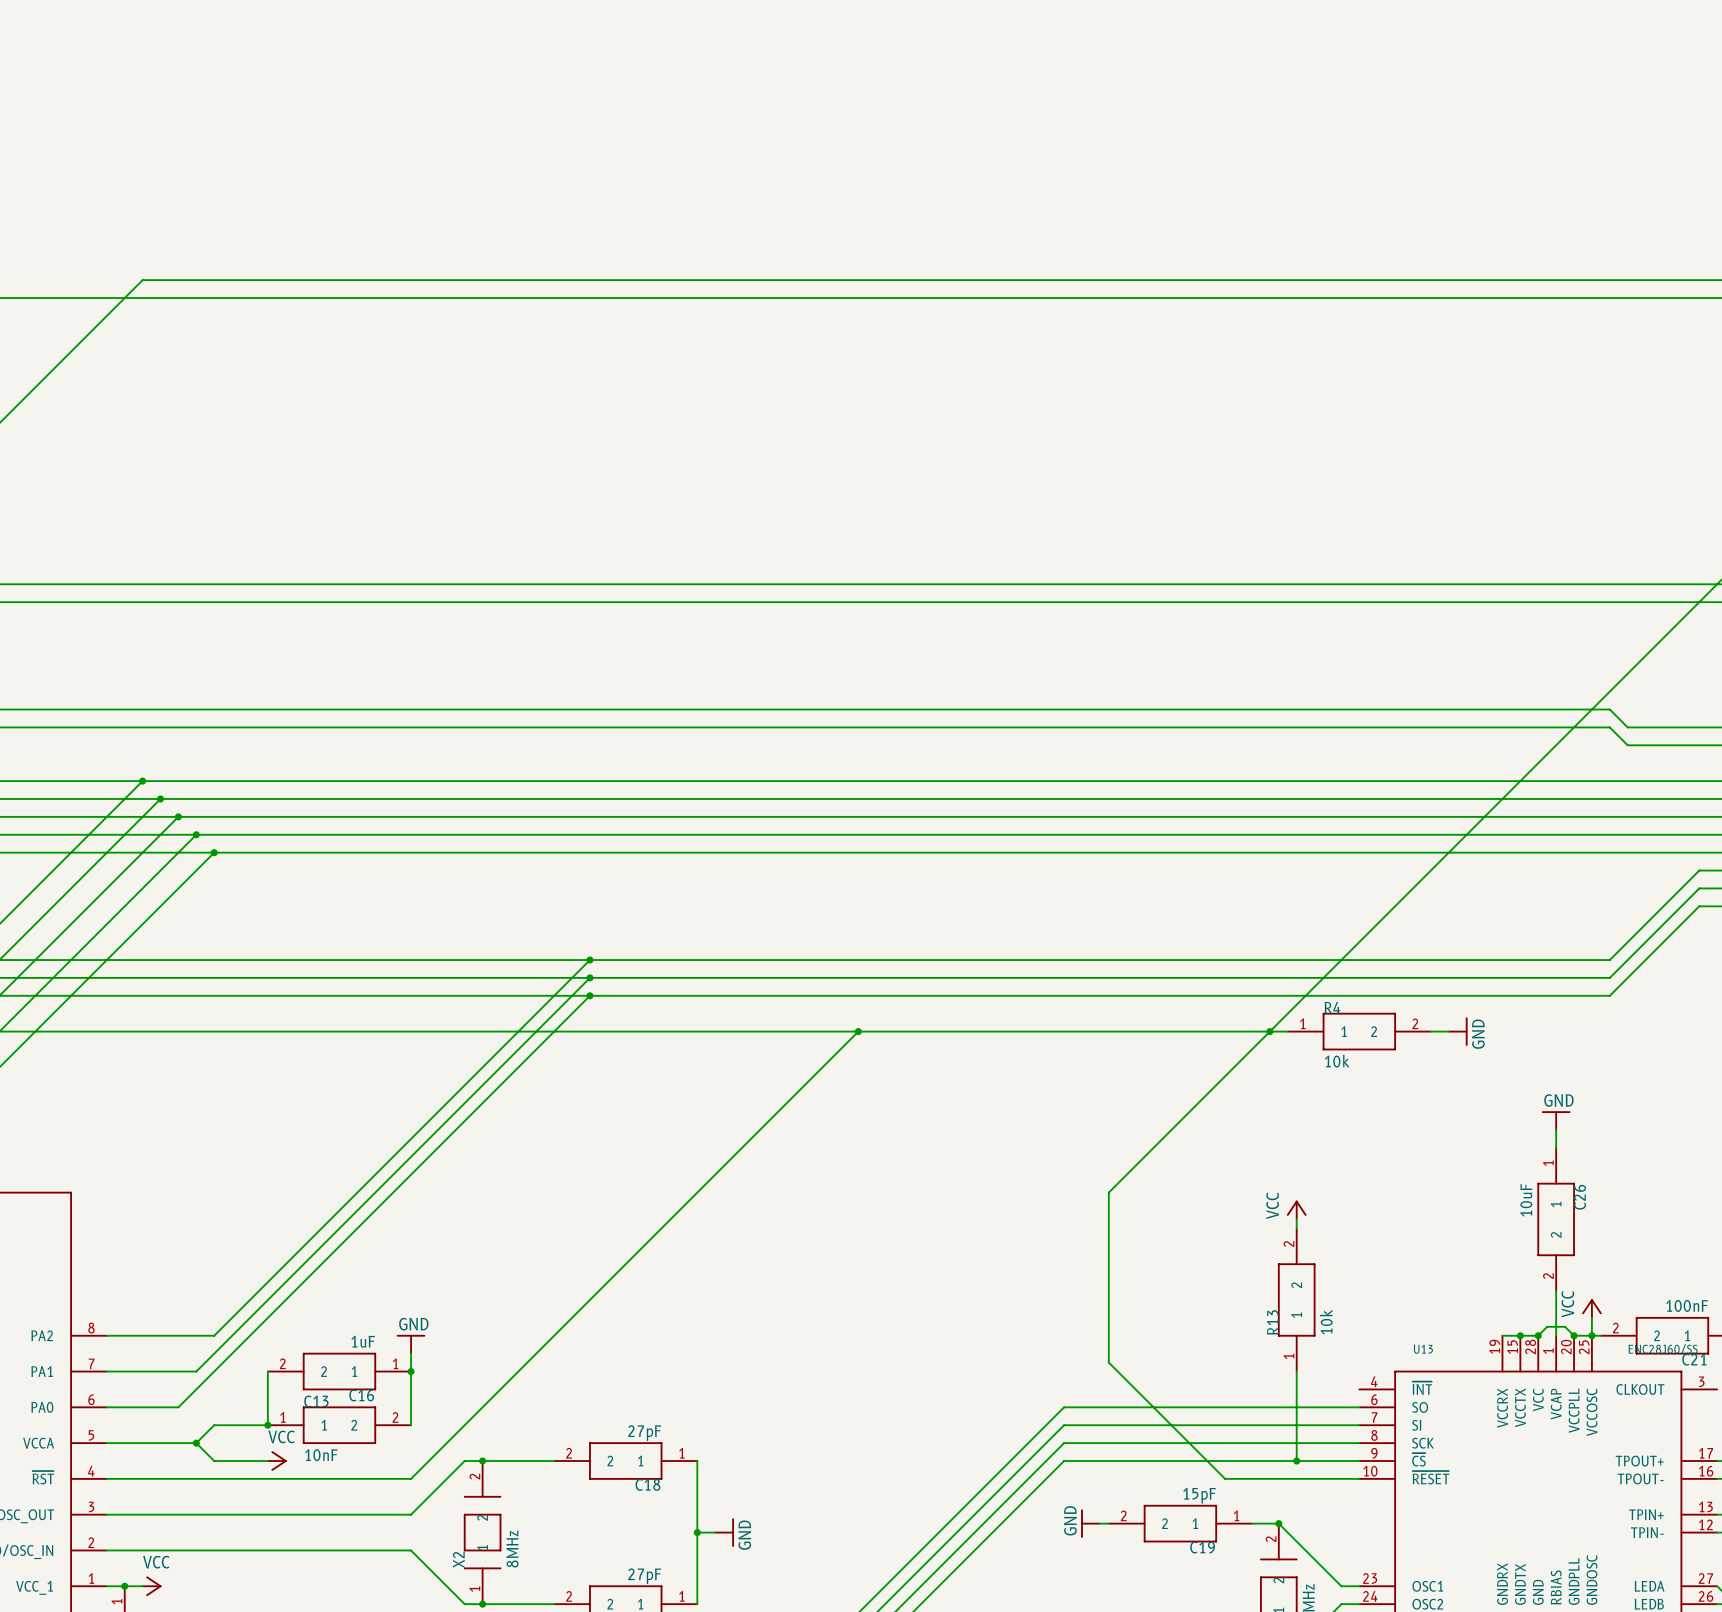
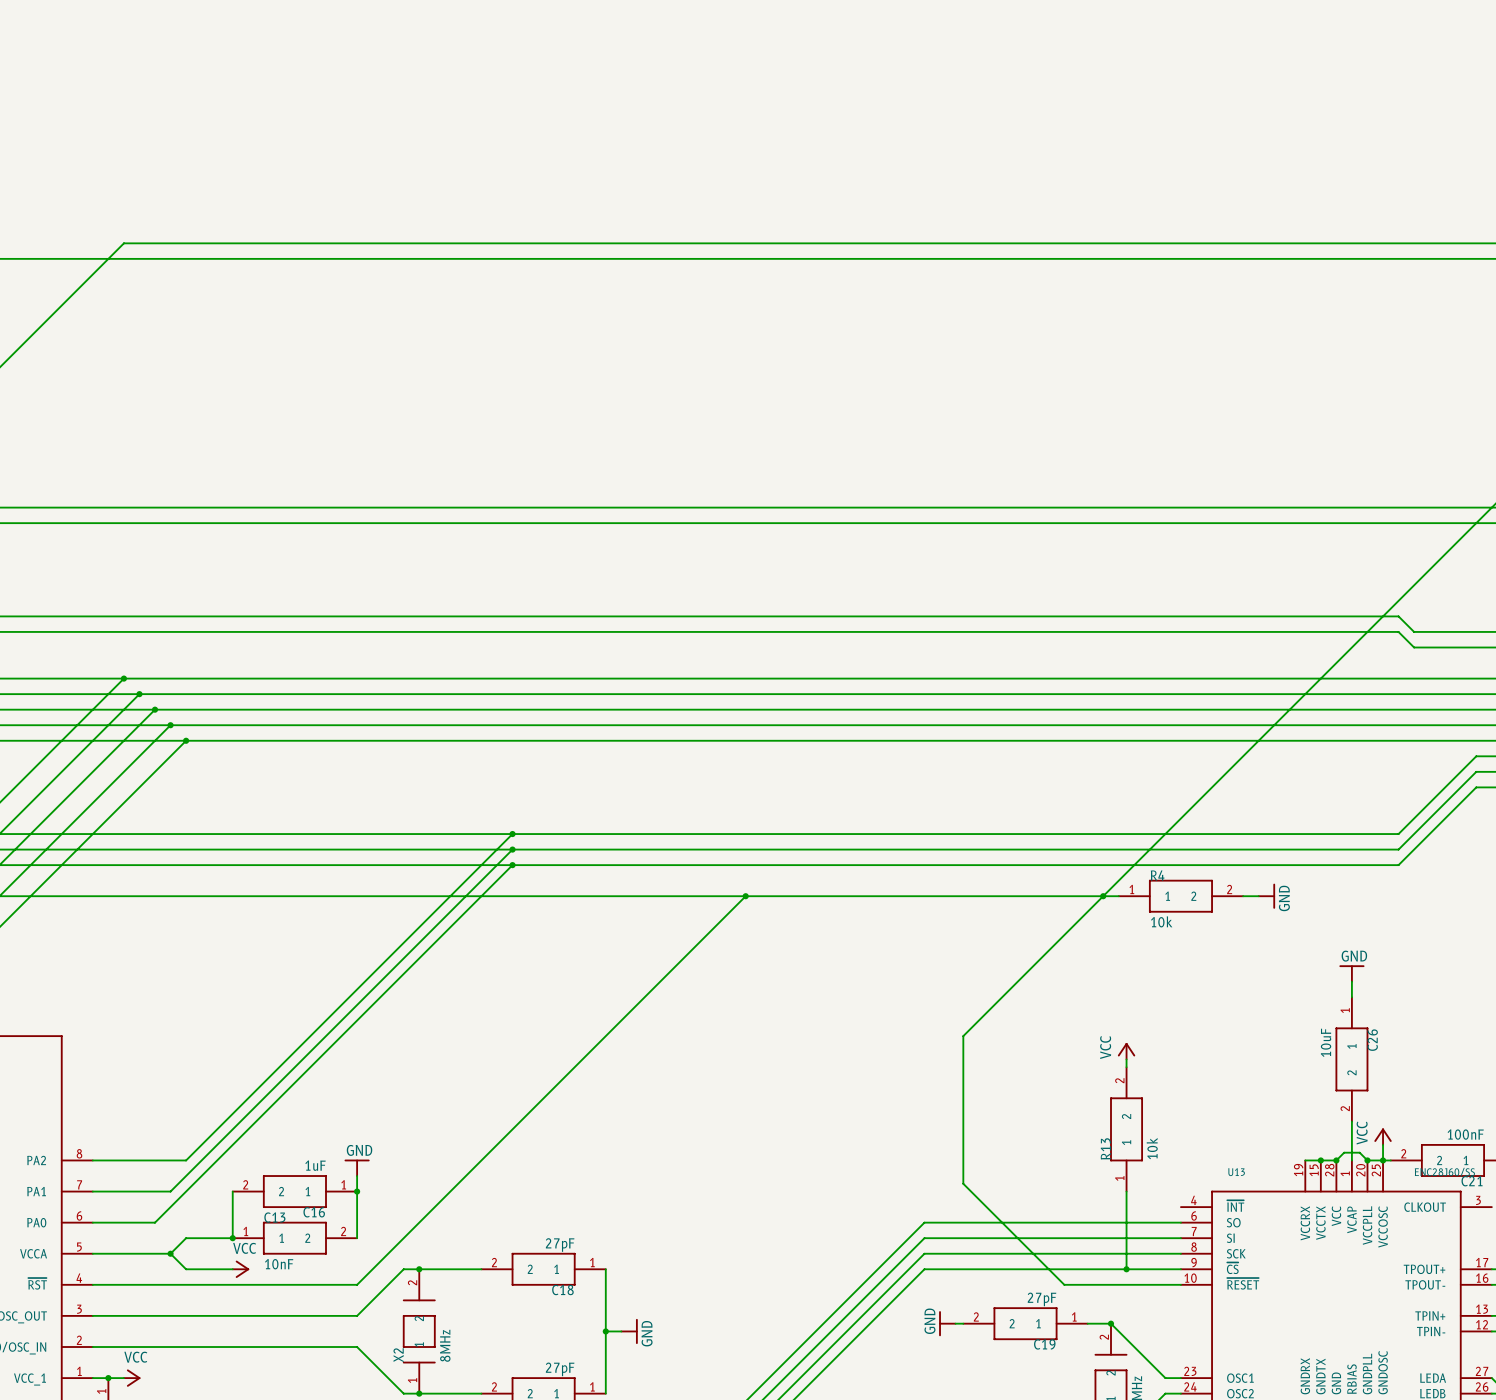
C19 value: 15pF (1199, 1495) -> 27pF (1042, 1299)

